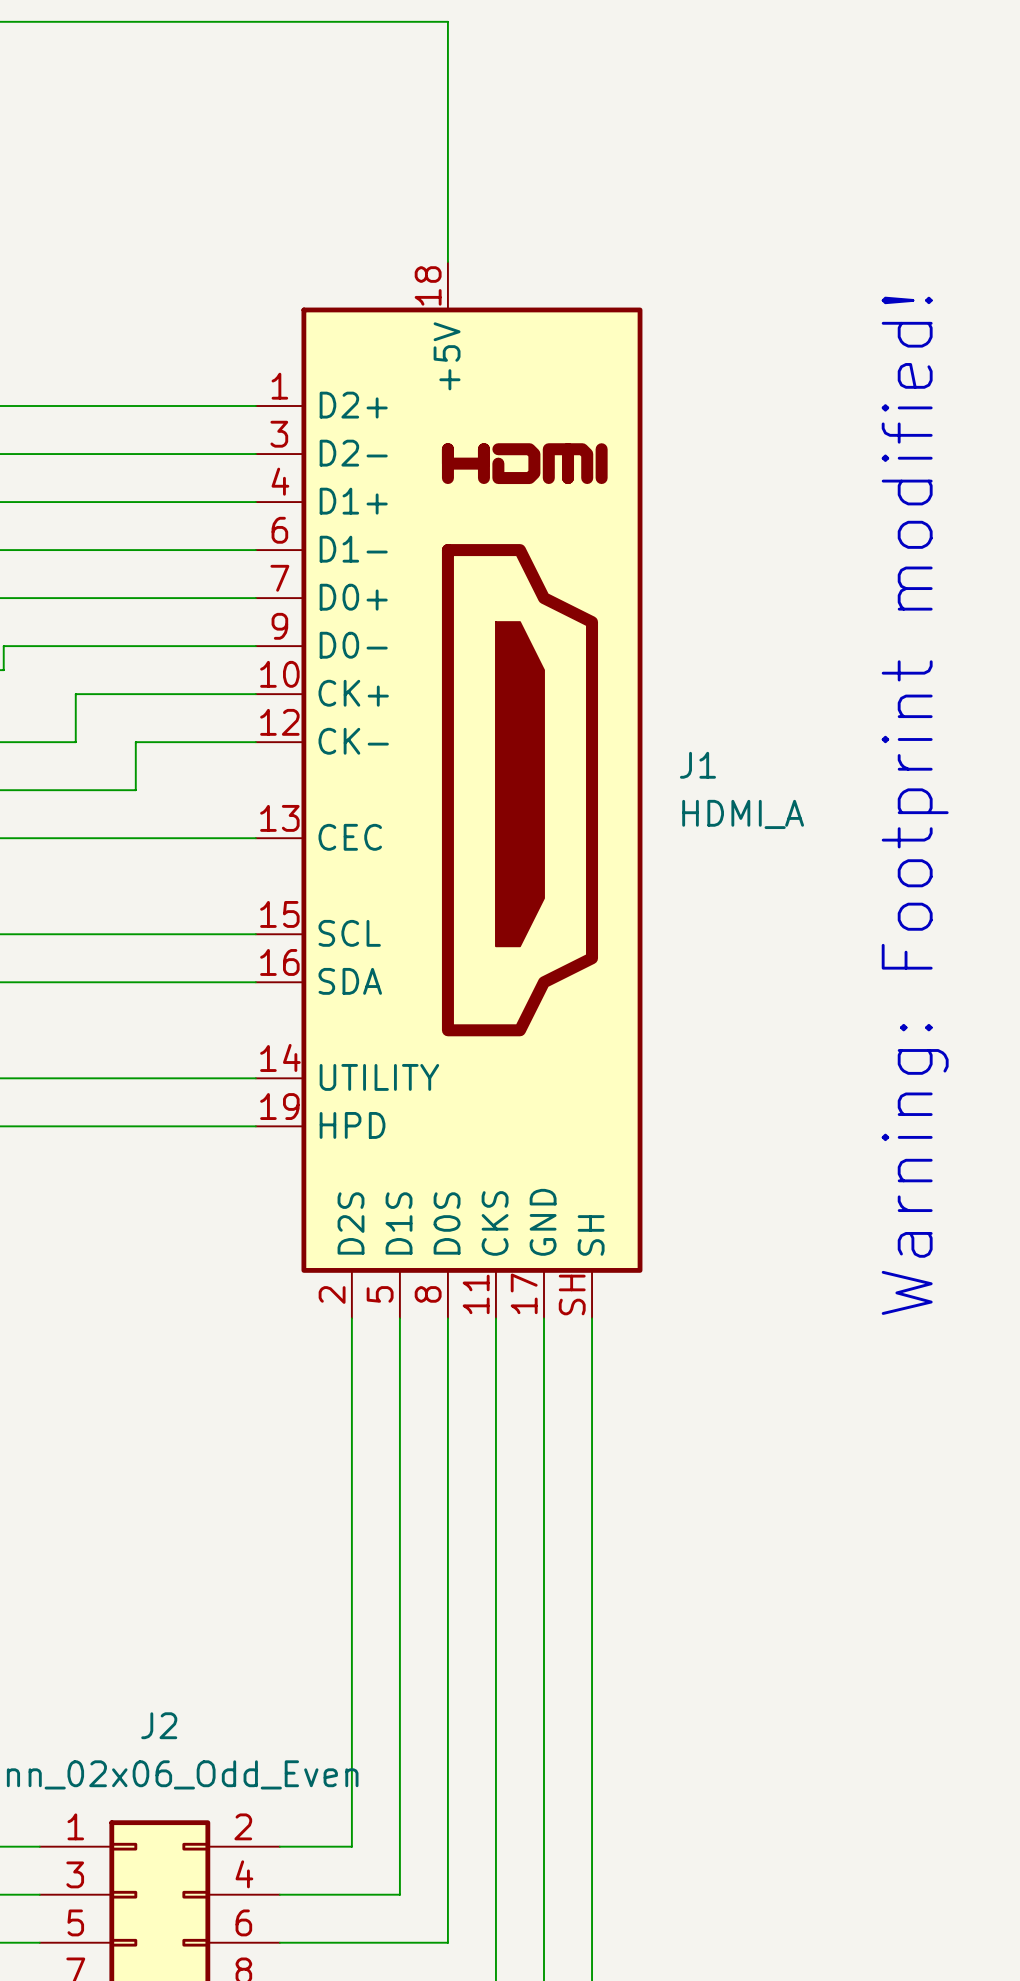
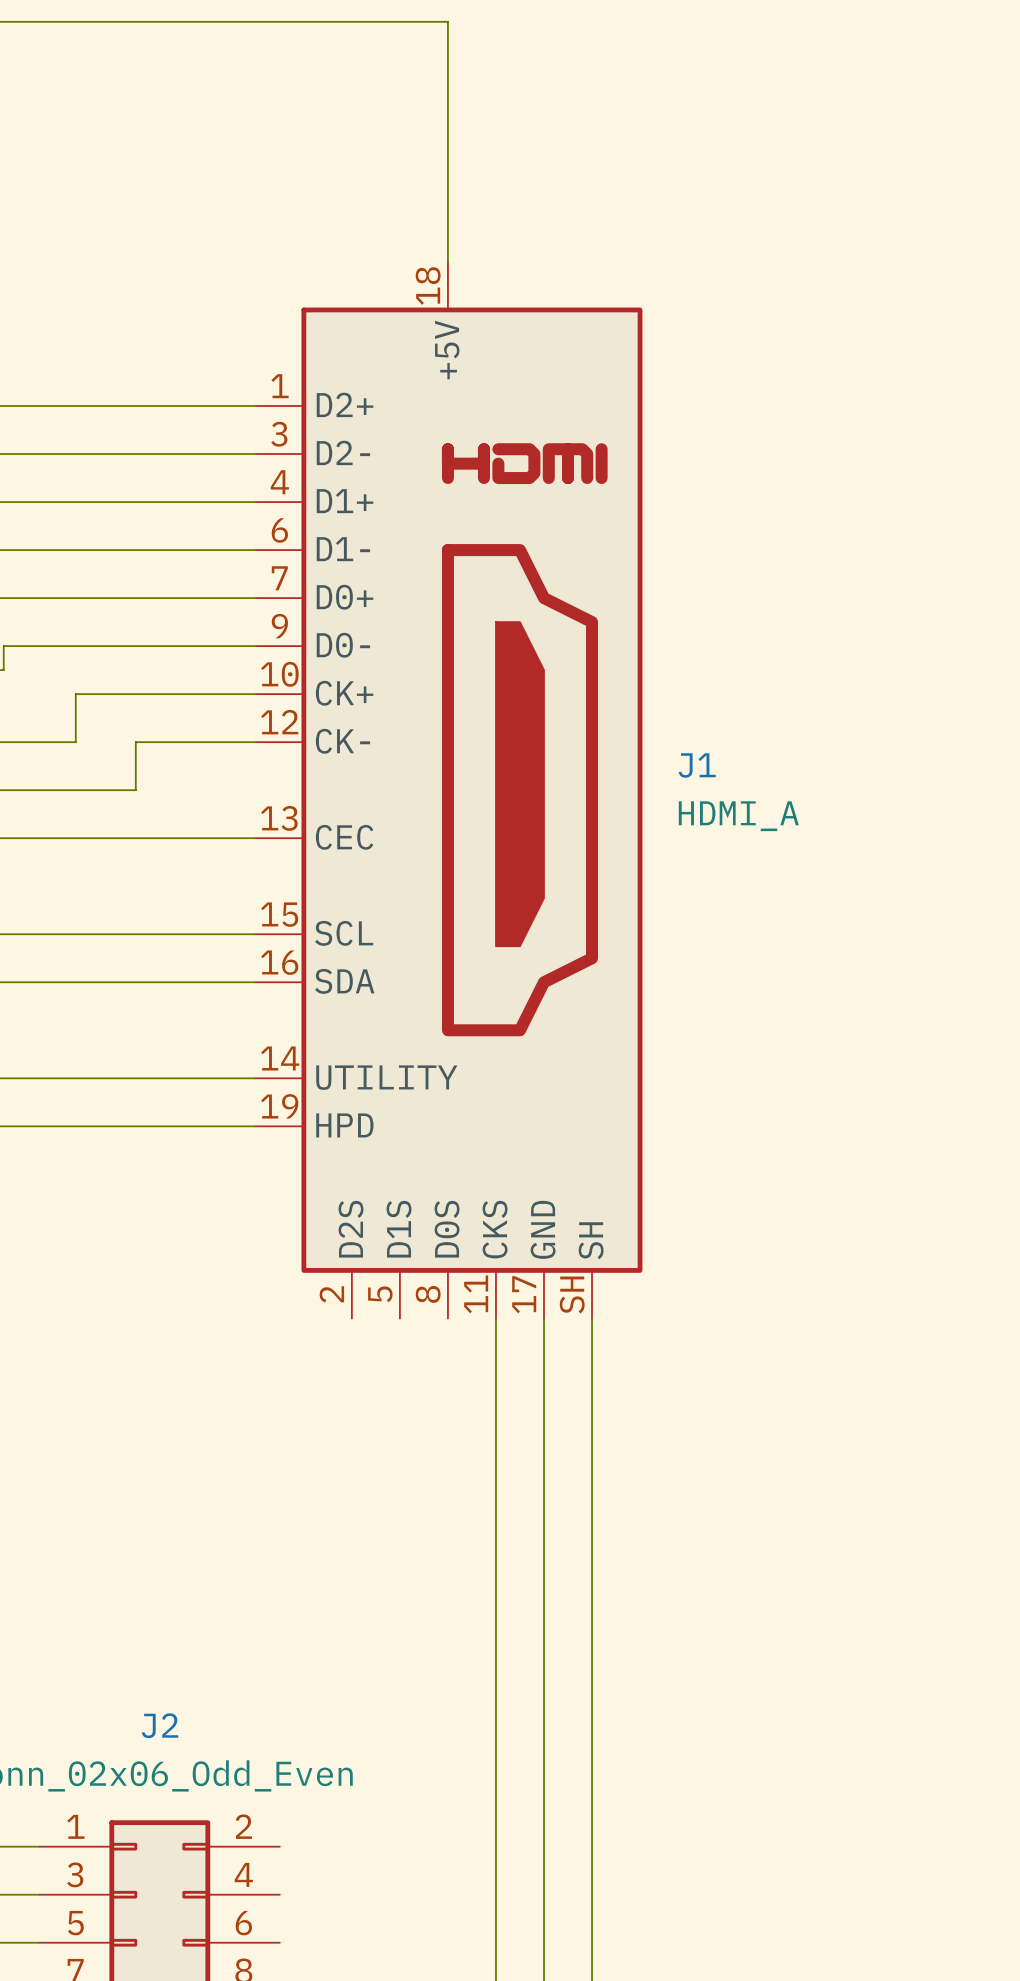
text: Warning: Footprint modified! (915, 805) -> none
wire: (351, 1318) (351, 1846) (279, 1846) -> none
wire: (399, 1318) (399, 1894) (279, 1894) -> none
wire: (447, 1318) (447, 1942) (279, 1942) -> none

